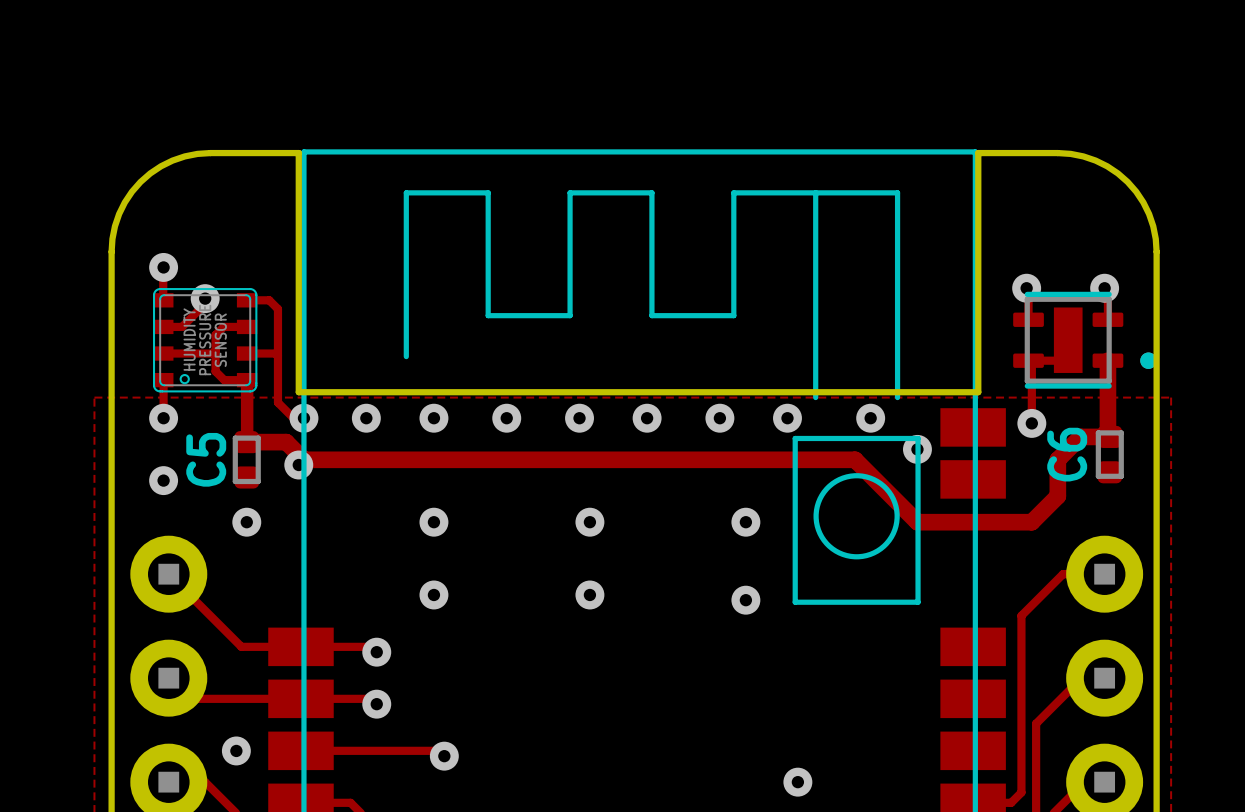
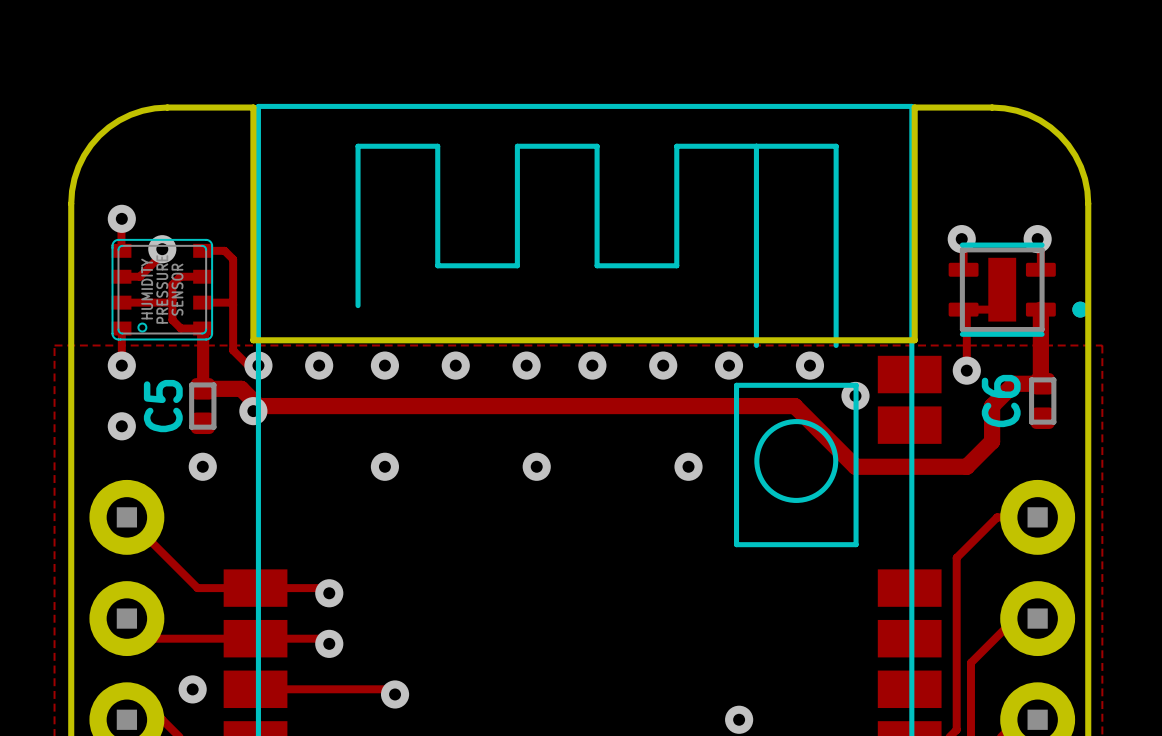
via: (433, 594) -> none
via: (589, 594) -> none
via: (745, 600) -> none

